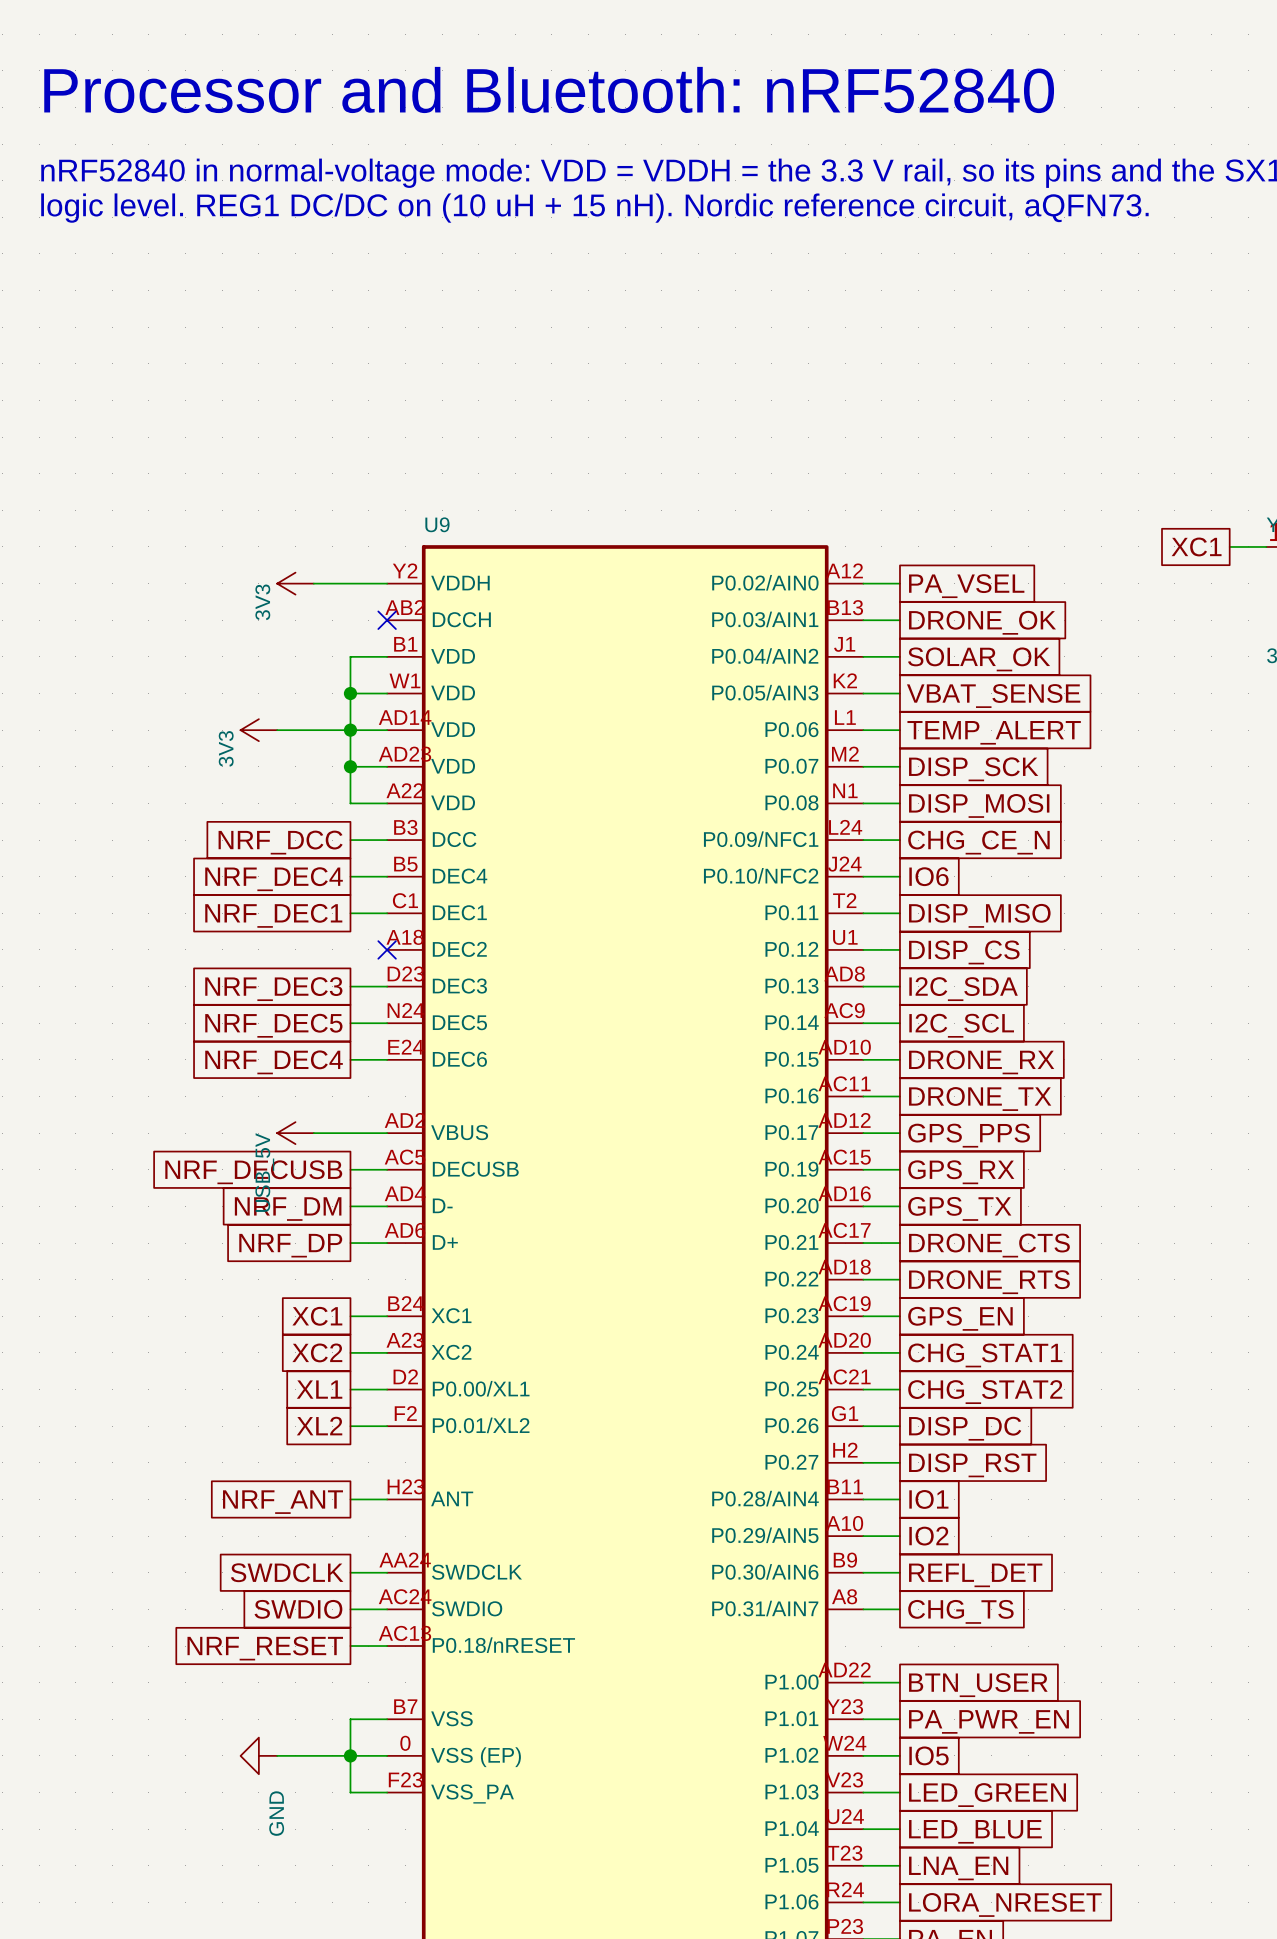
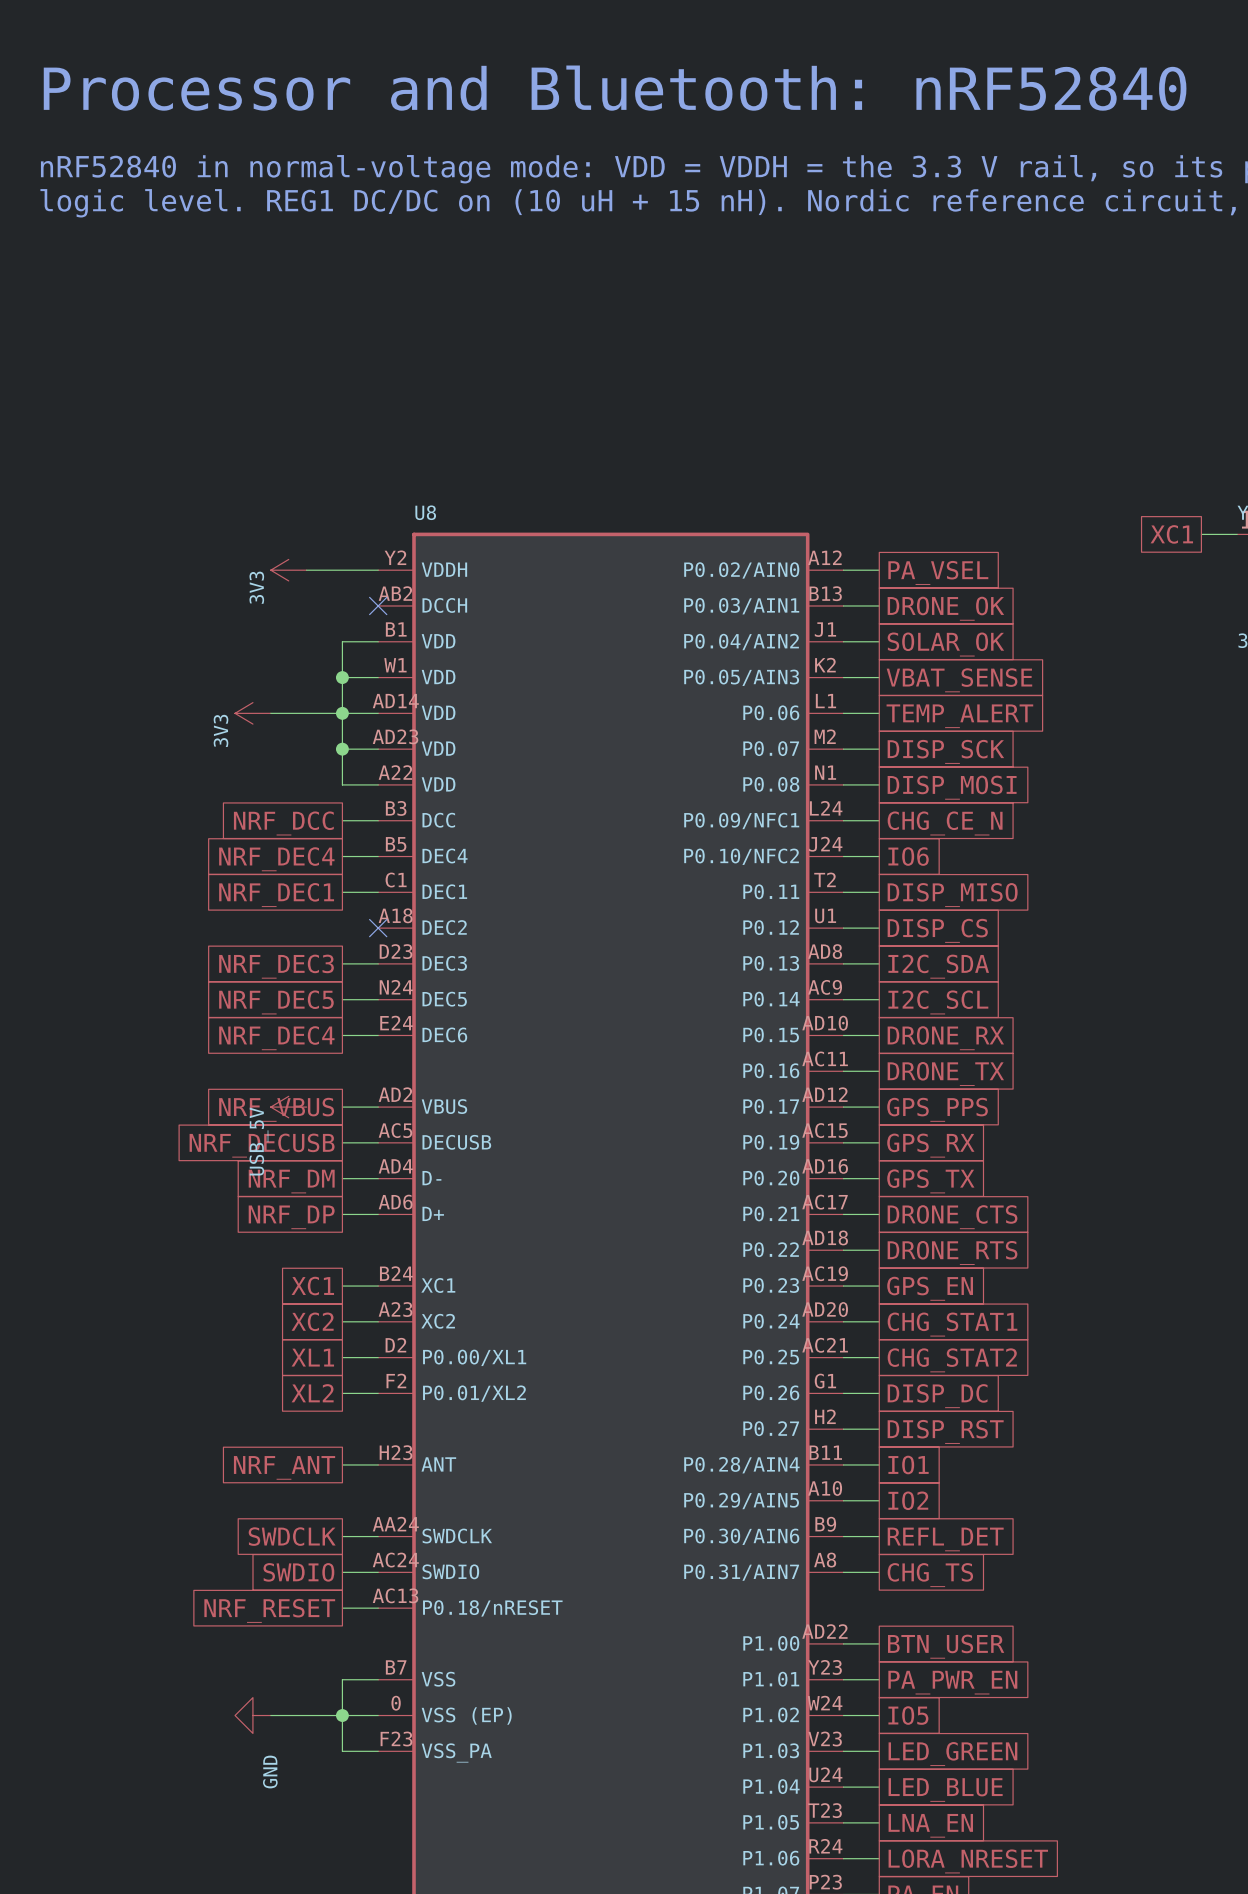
U9 name: U9 (437, 524) -> U8 (425, 512)
wire: (313, 1133) (350, 1133) -> none
global label: none -> NRF_VBUS (276, 1109)

